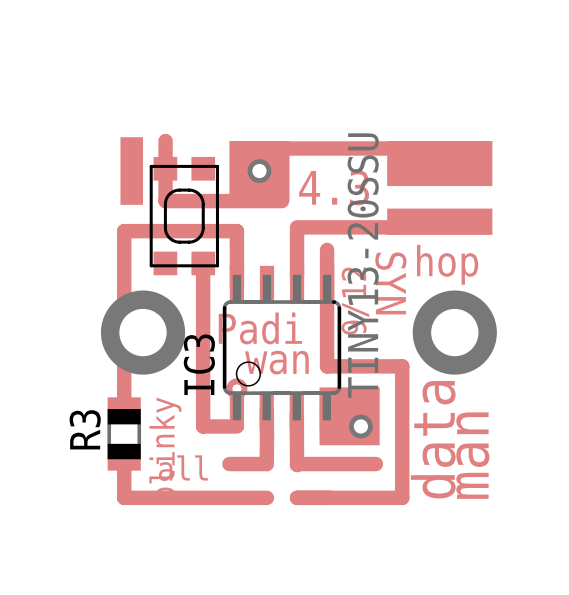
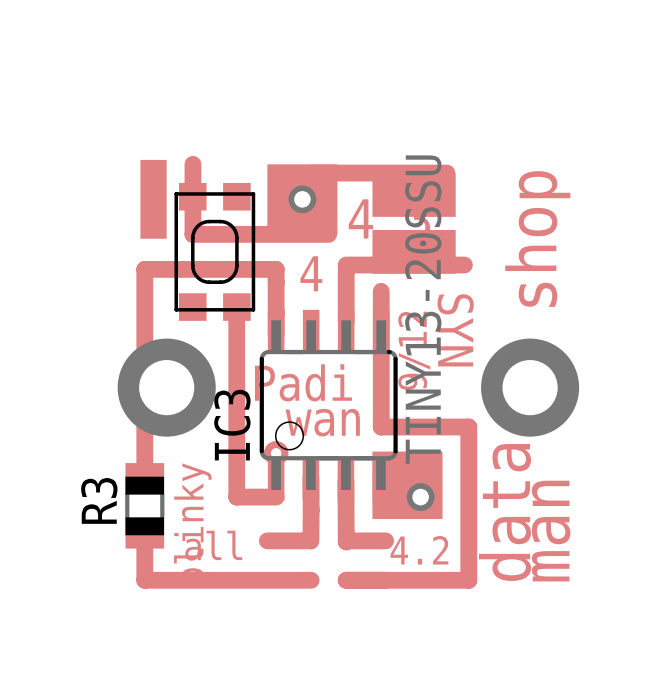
drawing: [387, 140, 493, 235] -> none
drawing: none -> [372, 173, 456, 274]
text: none -> 4 (311, 273)
text: hop (447, 264) -> shop (537, 238)
track: (330, 464) (375, 464) -> none
text: none -> 4.2 (419, 550)

